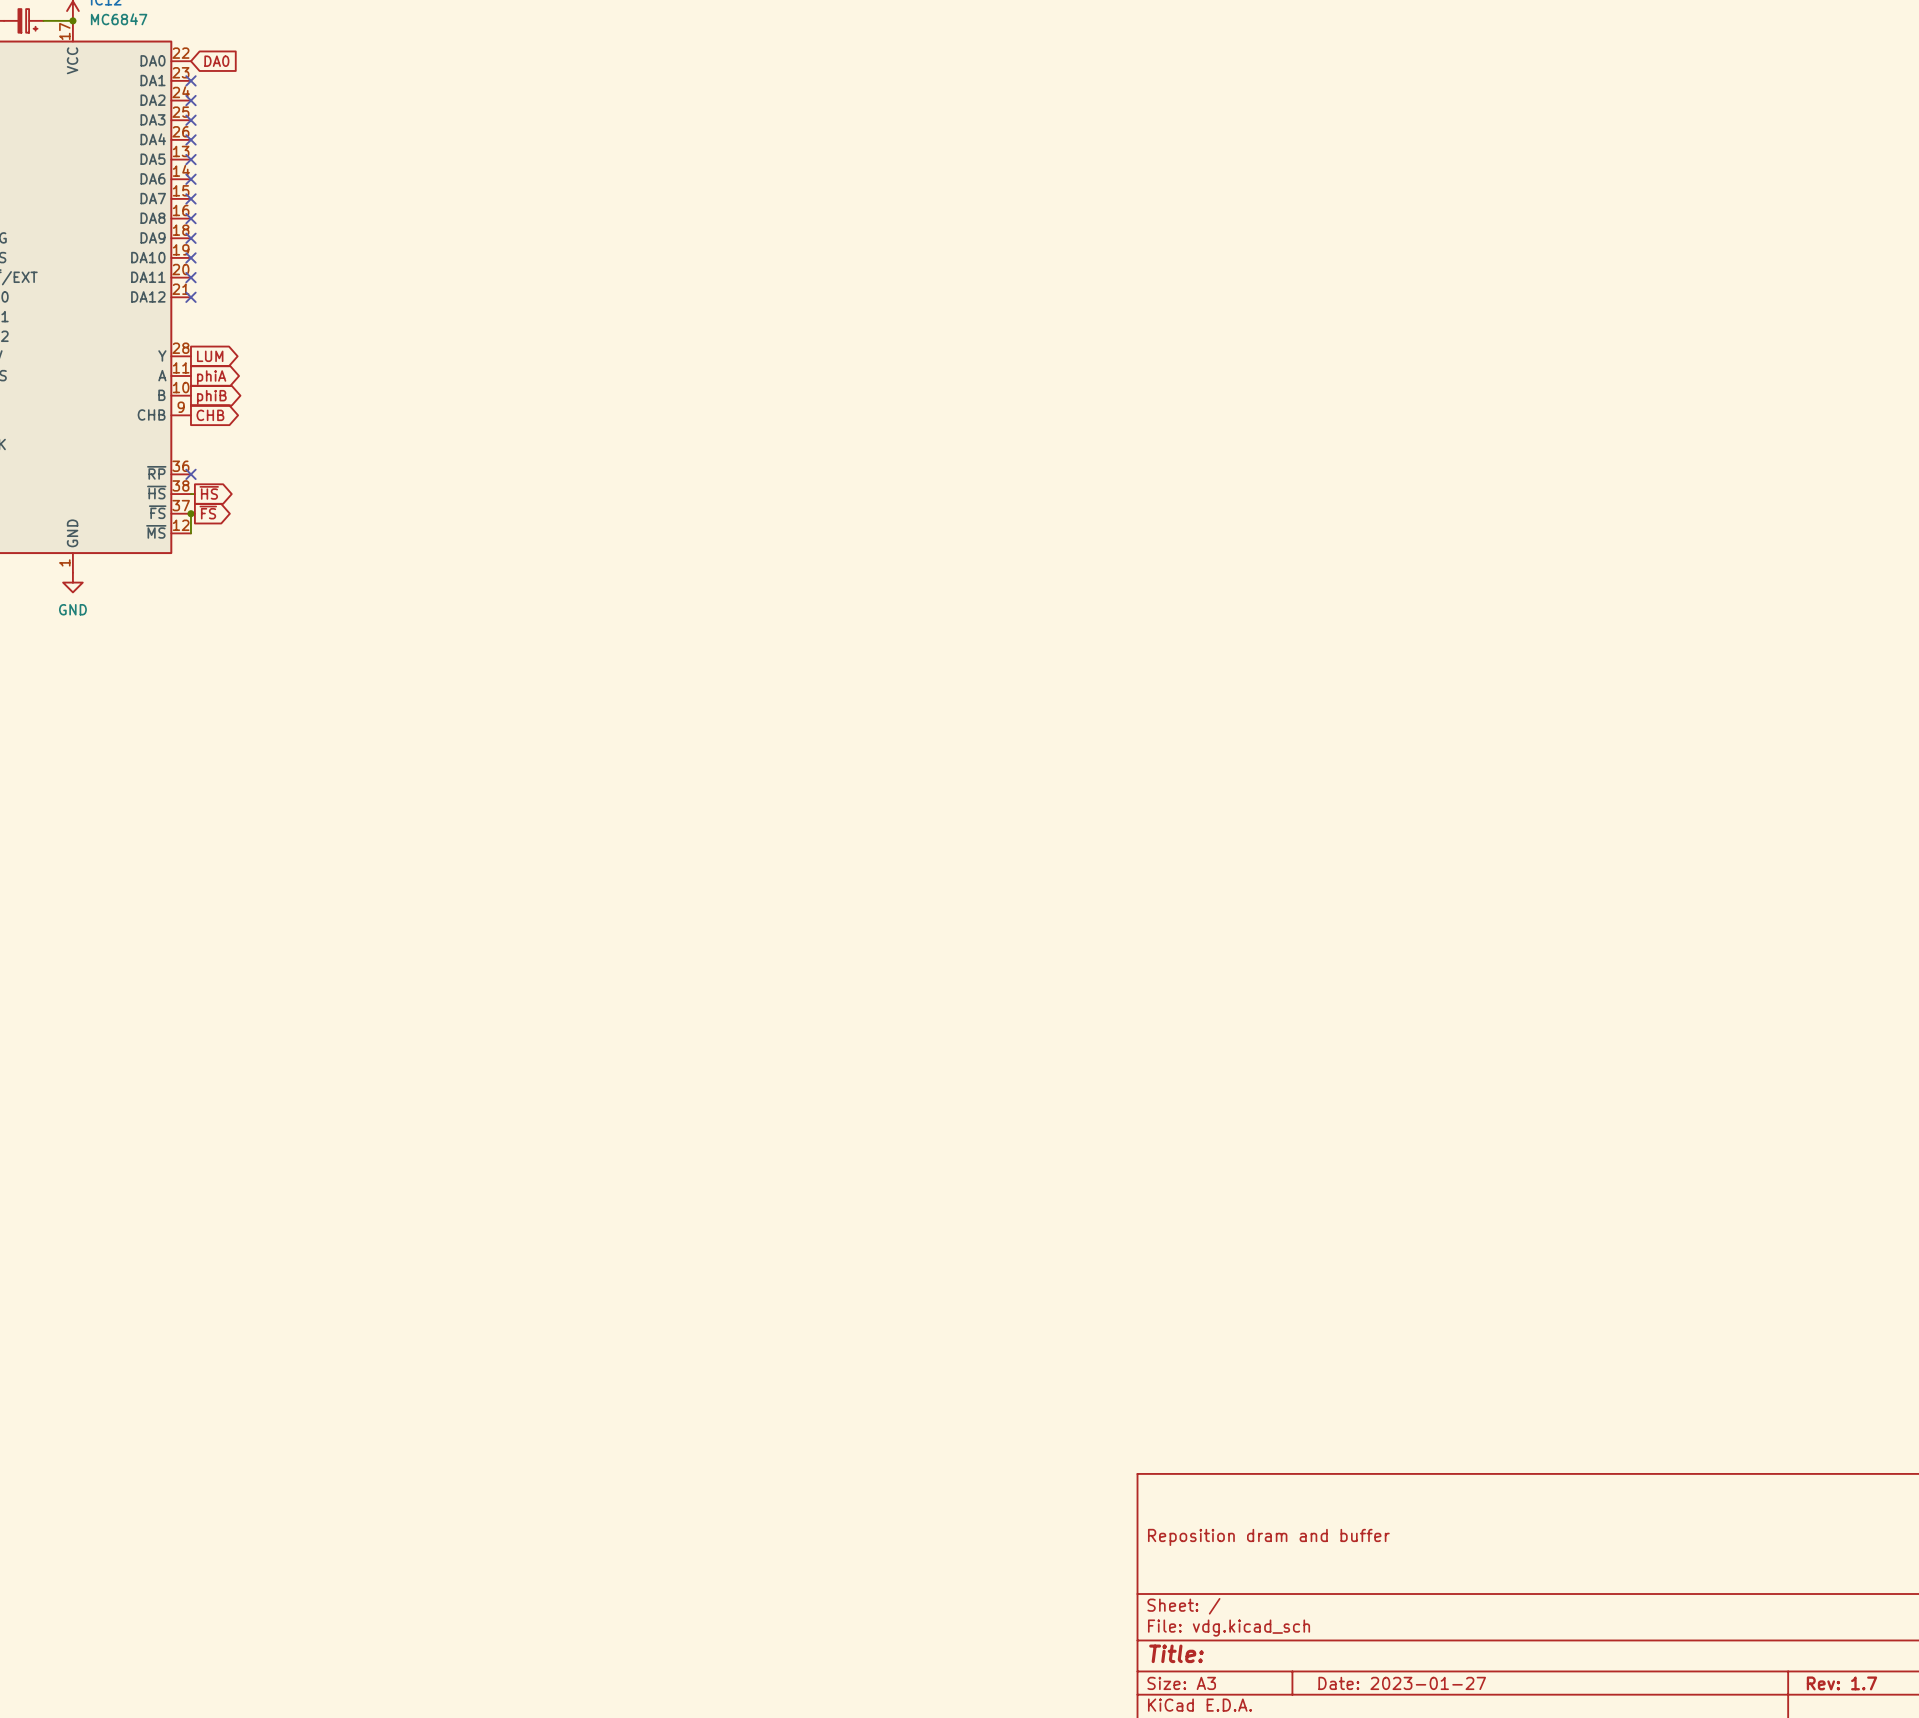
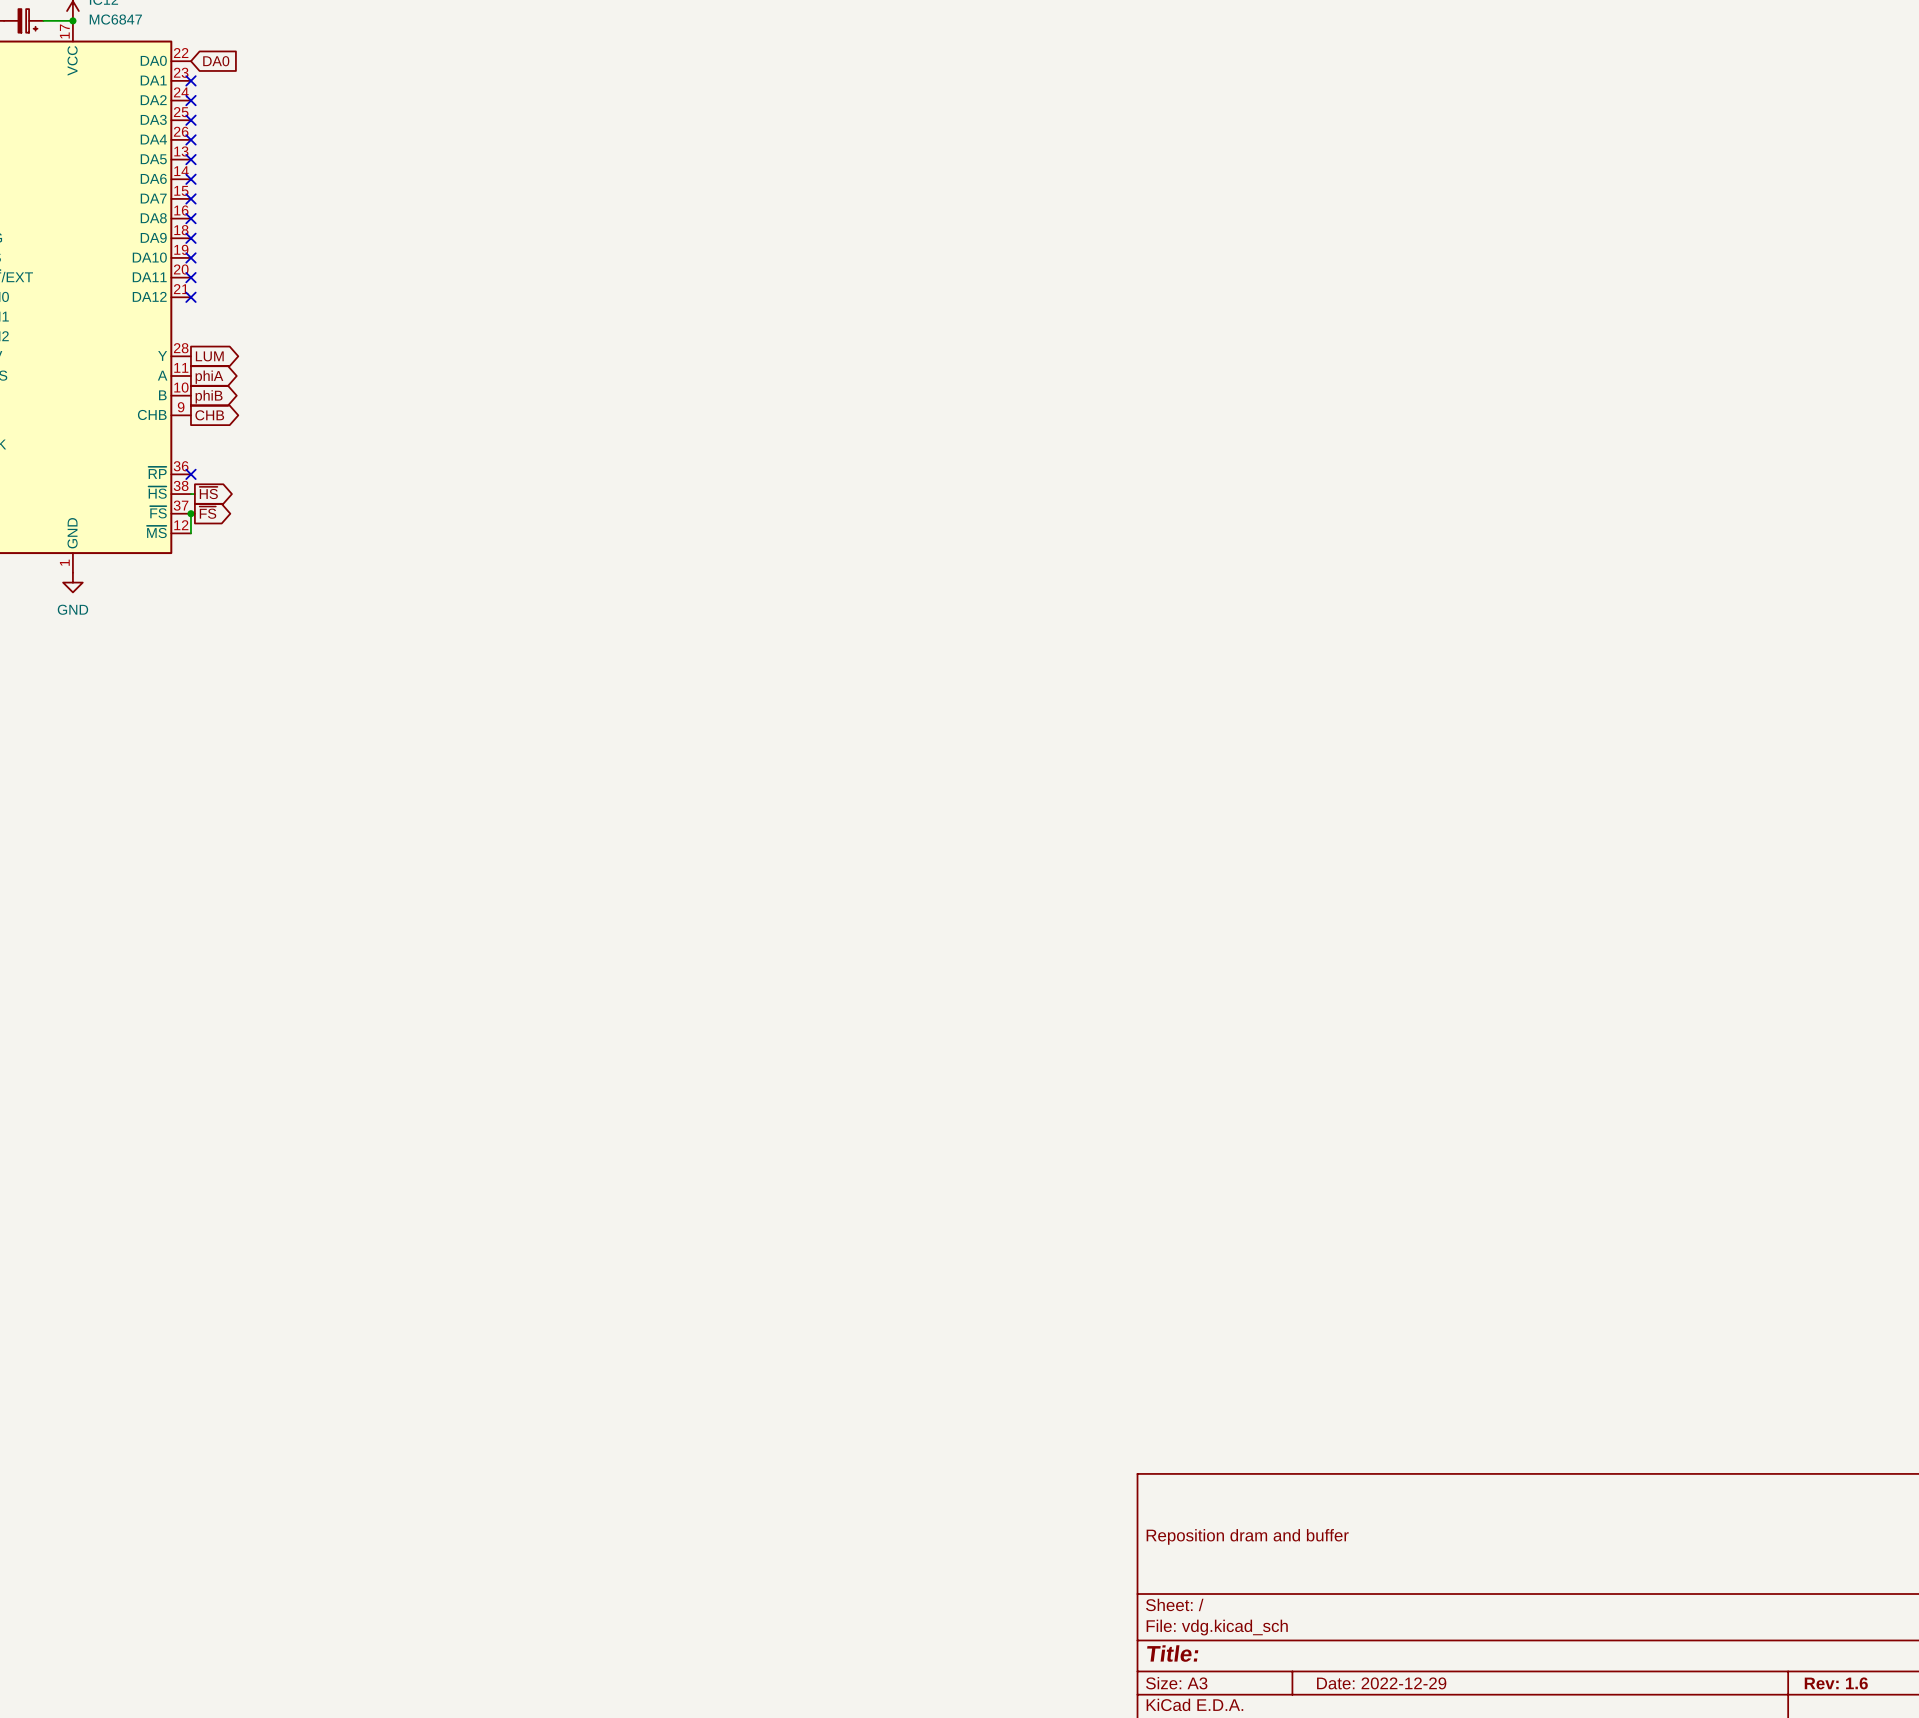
title block: Date: 2023-01-27 (1402, 1683) -> Date: 2022-12-29 (1381, 1683)
title block: Rev: 1.7 (1841, 1683) -> Rev: 1.6 (1836, 1683)

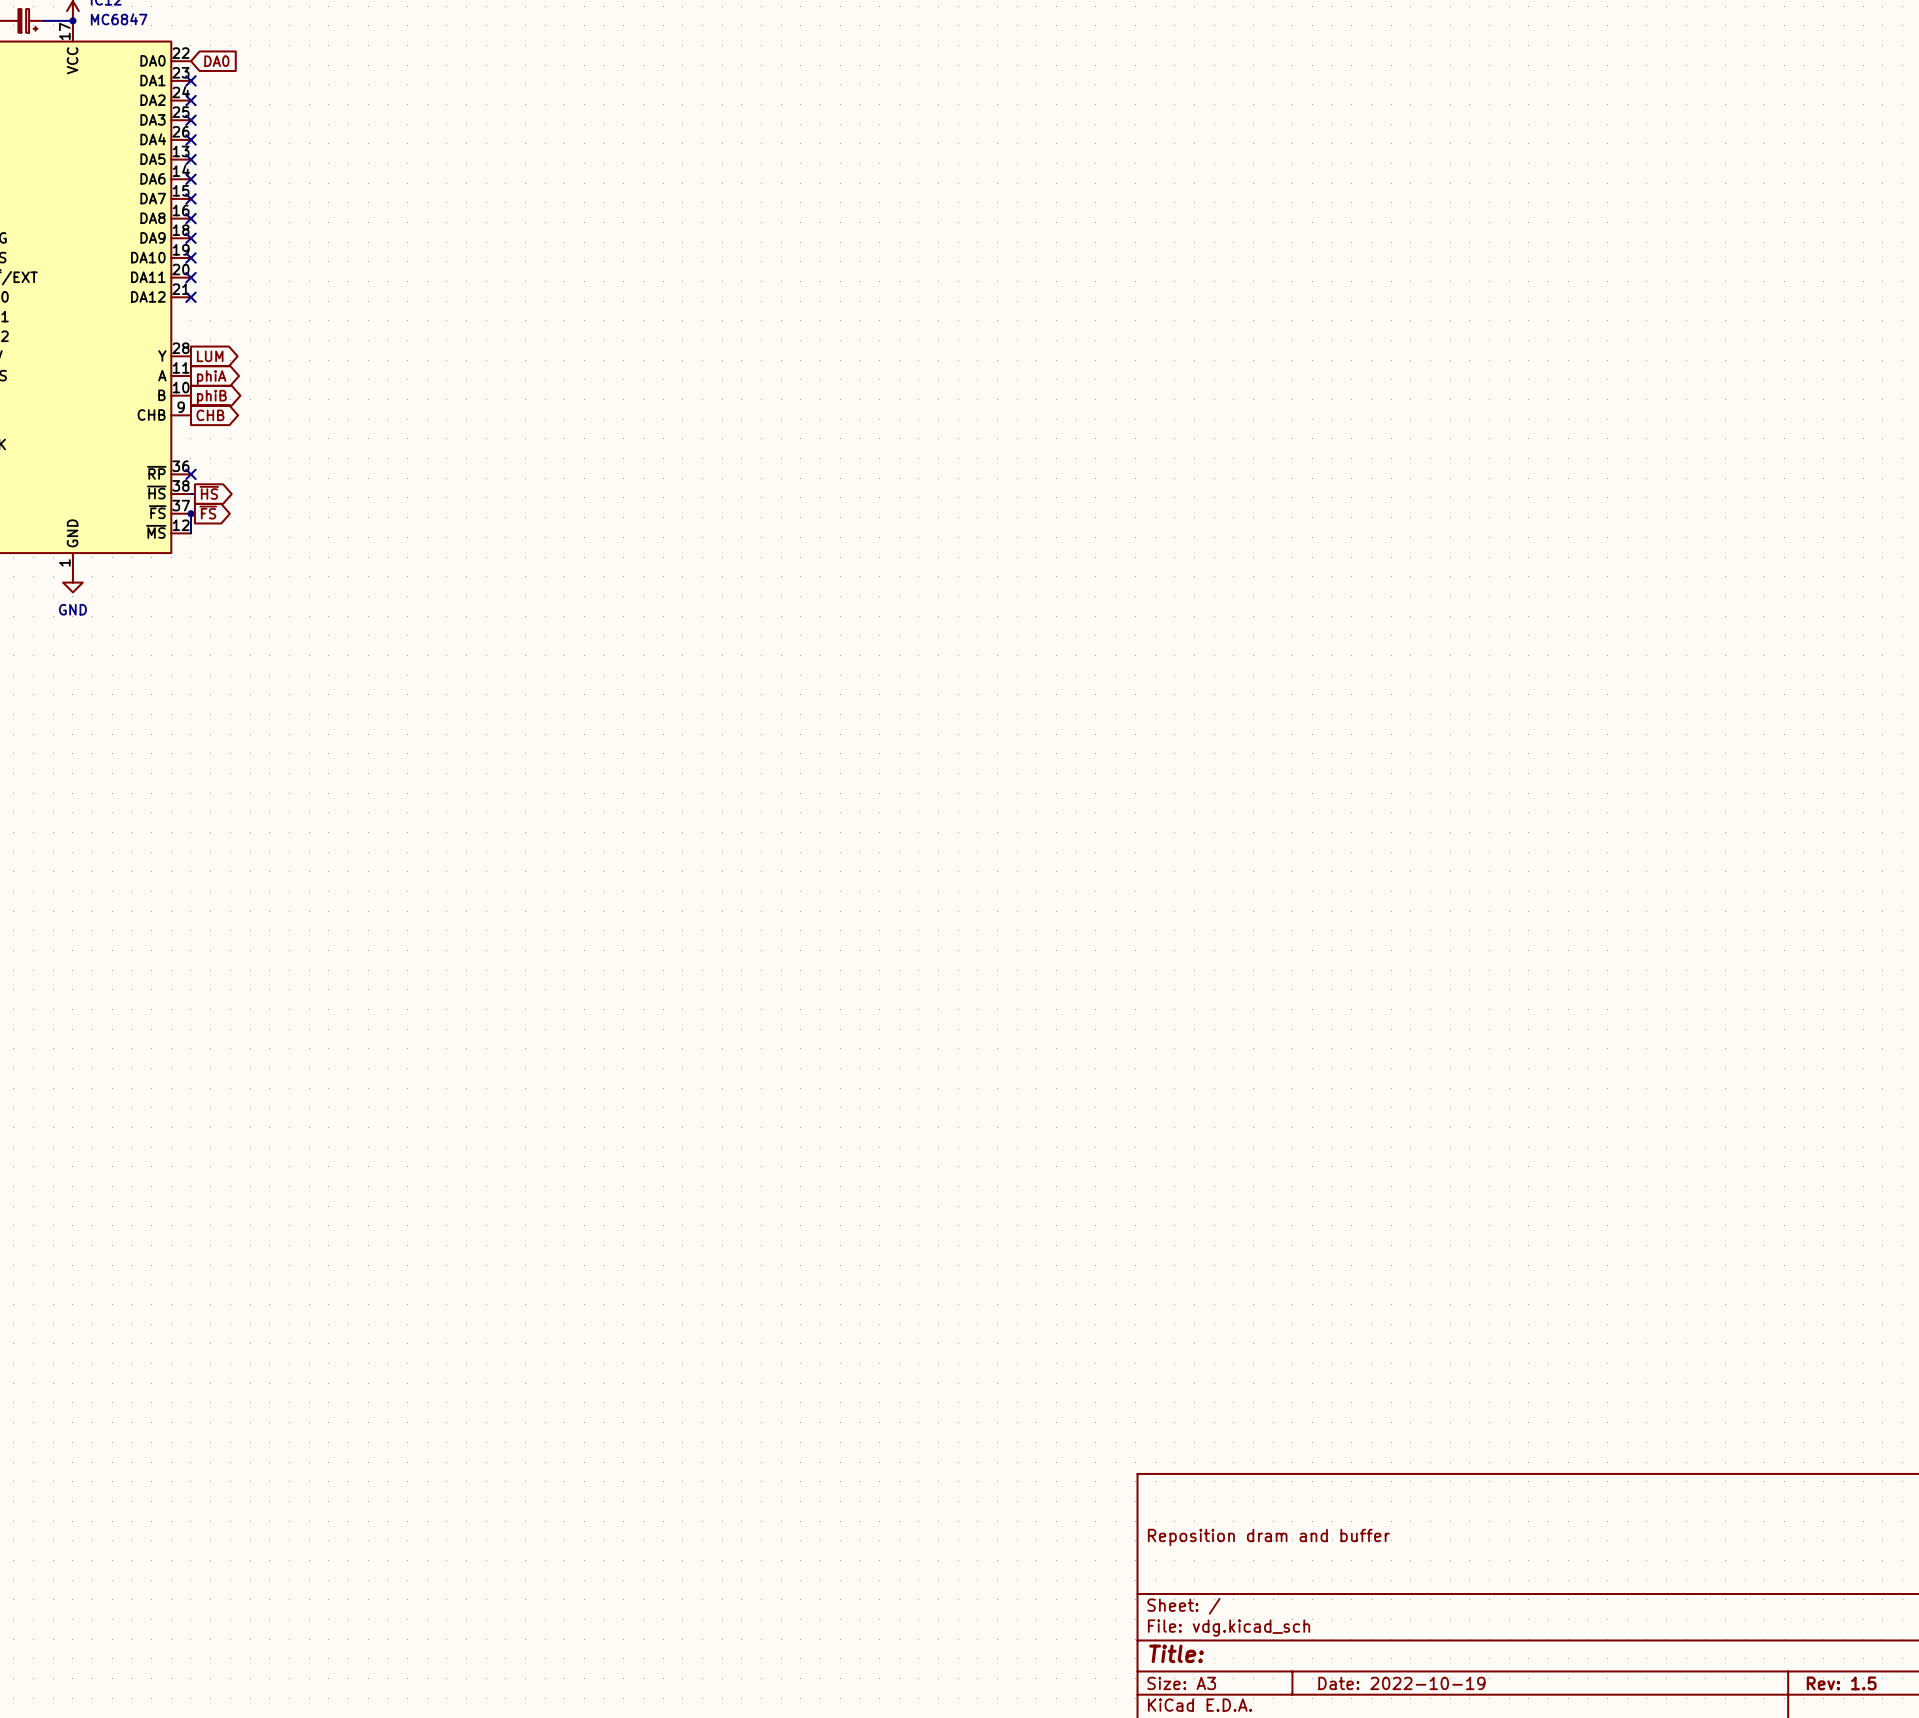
title block: Date: 2022-12-29 (1381, 1683) -> Date: 2022-10-19 (1401, 1683)
title block: Rev: 1.6 (1836, 1683) -> Rev: 1.5 (1841, 1683)

